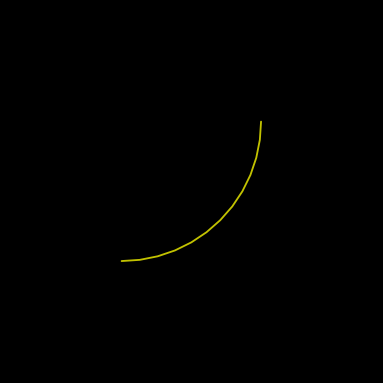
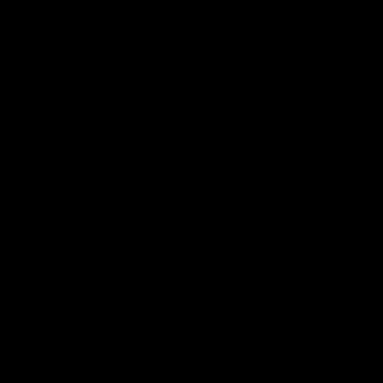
board edge: (261, 121) (259, 139) (250, 174) (242, 191) (220, 220) (191, 242) (174, 250) (139, 259) (121, 261) -> none

